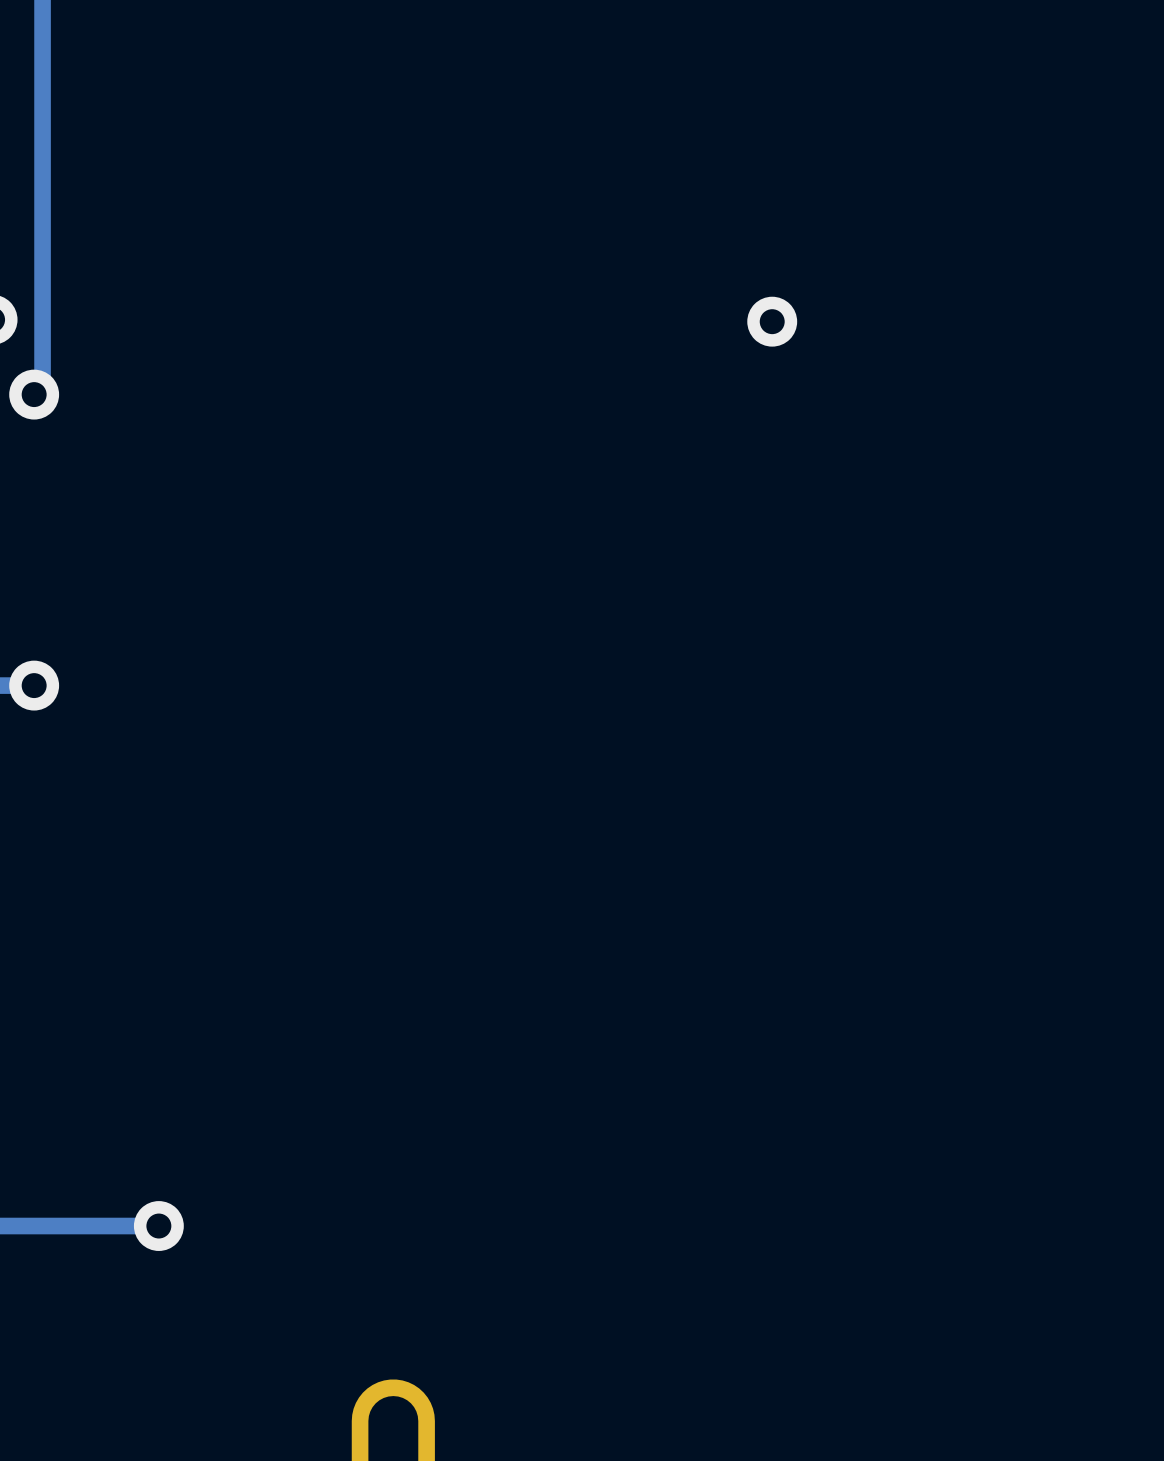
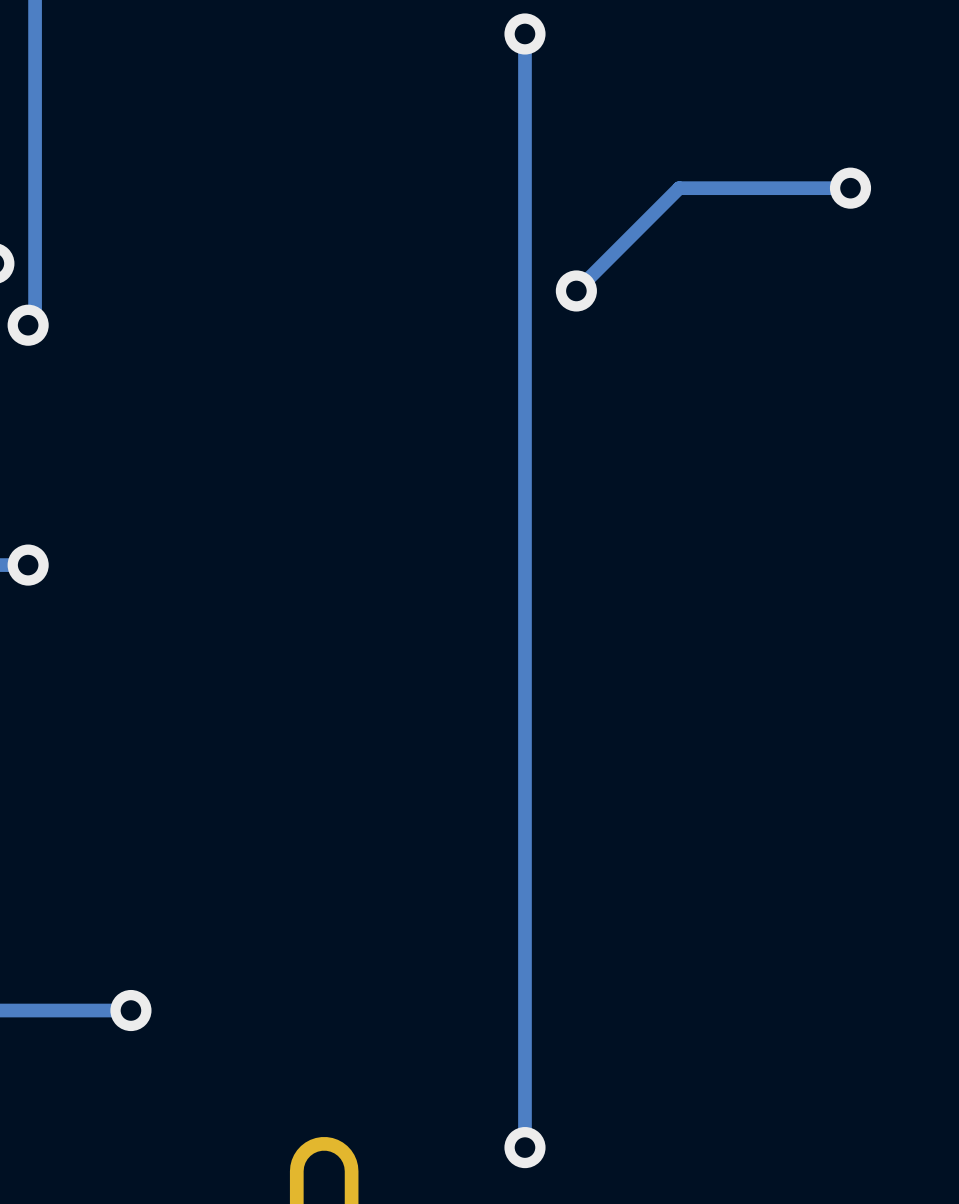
track: none -> (524, 33) (524, 1147)
via: none -> (524, 33)
track: none -> (850, 188) (679, 188) (576, 290)
via: none -> (850, 188)
via position: (772, 321) -> (576, 290)
via: none -> (524, 1147)

